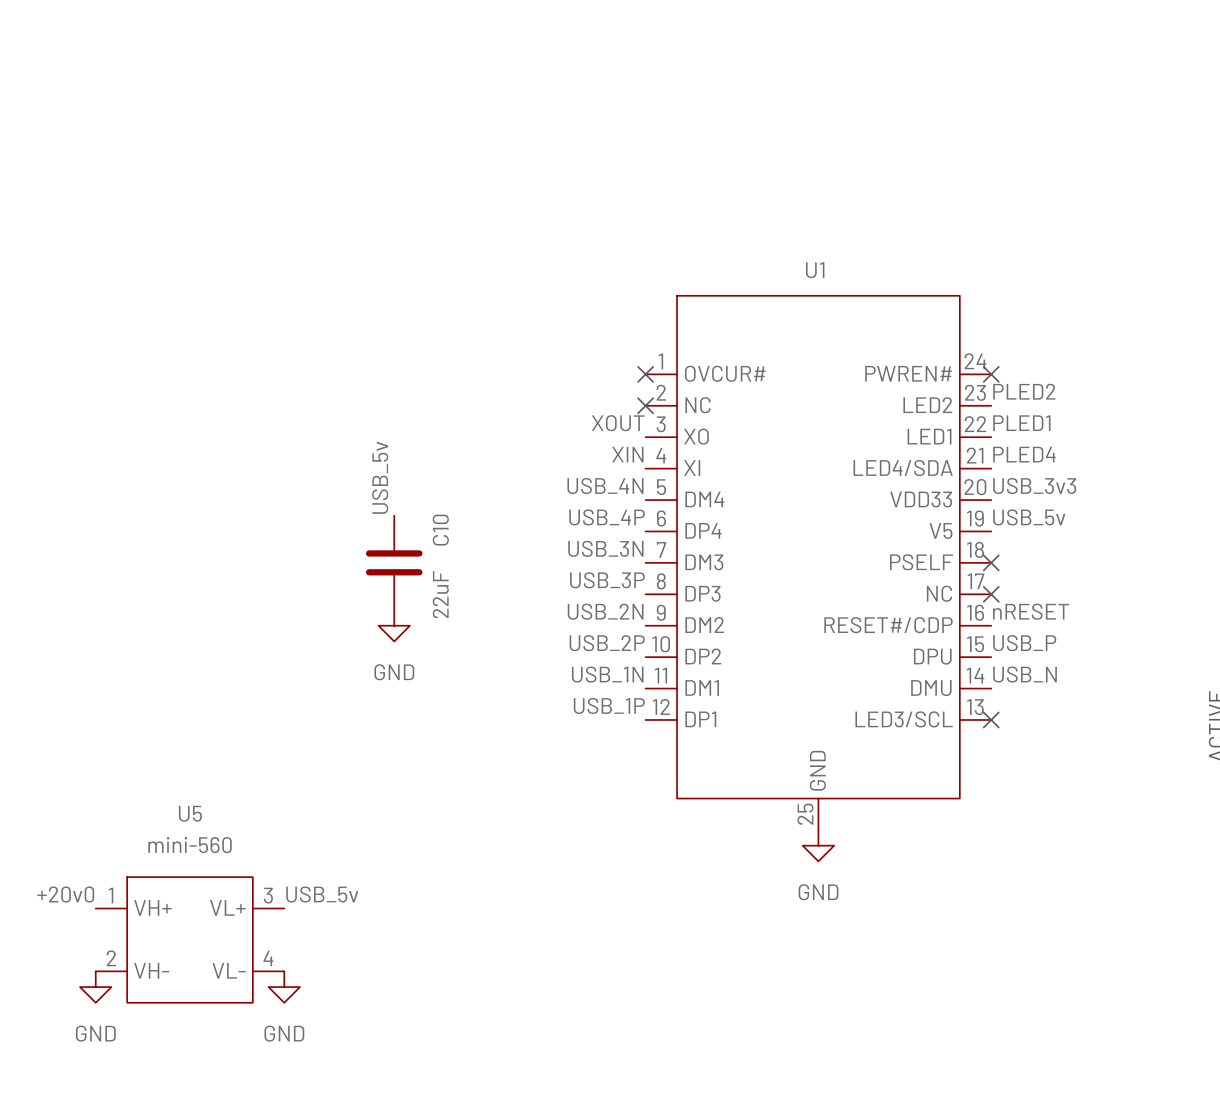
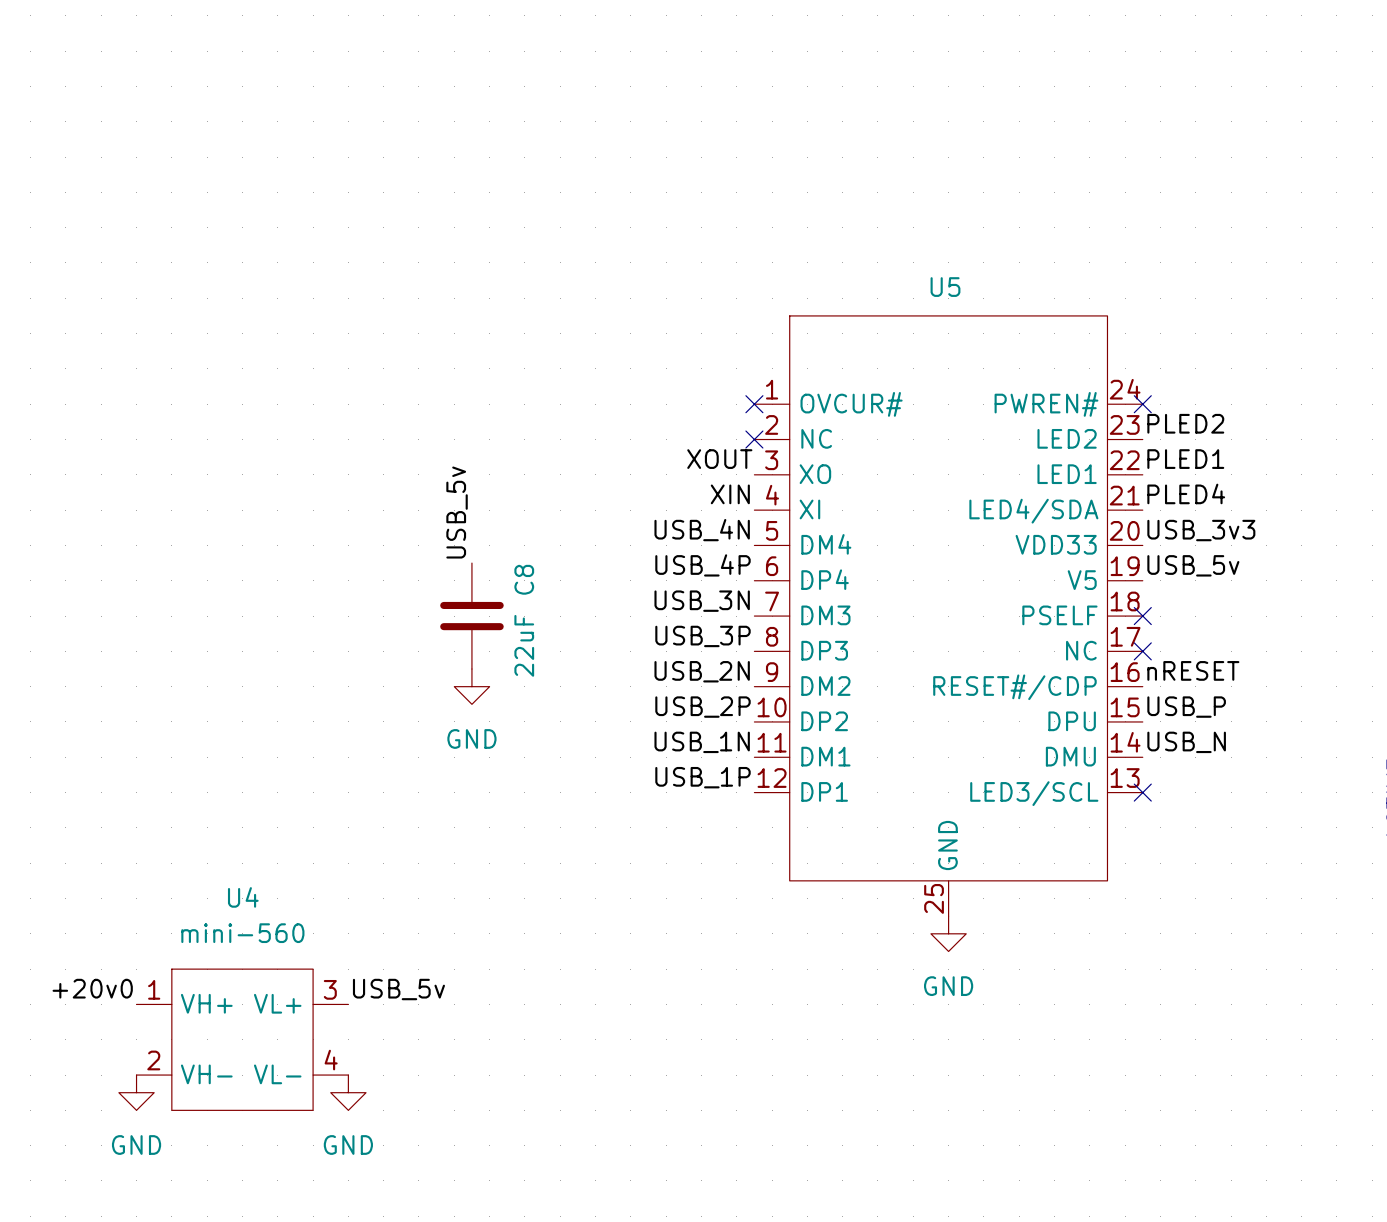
U1 name: U1 (815, 270) -> U5 (945, 287)
C10 name: C10 (440, 530) -> C8 (524, 579)
U5 name: U5 (190, 813) -> U4 (243, 897)

